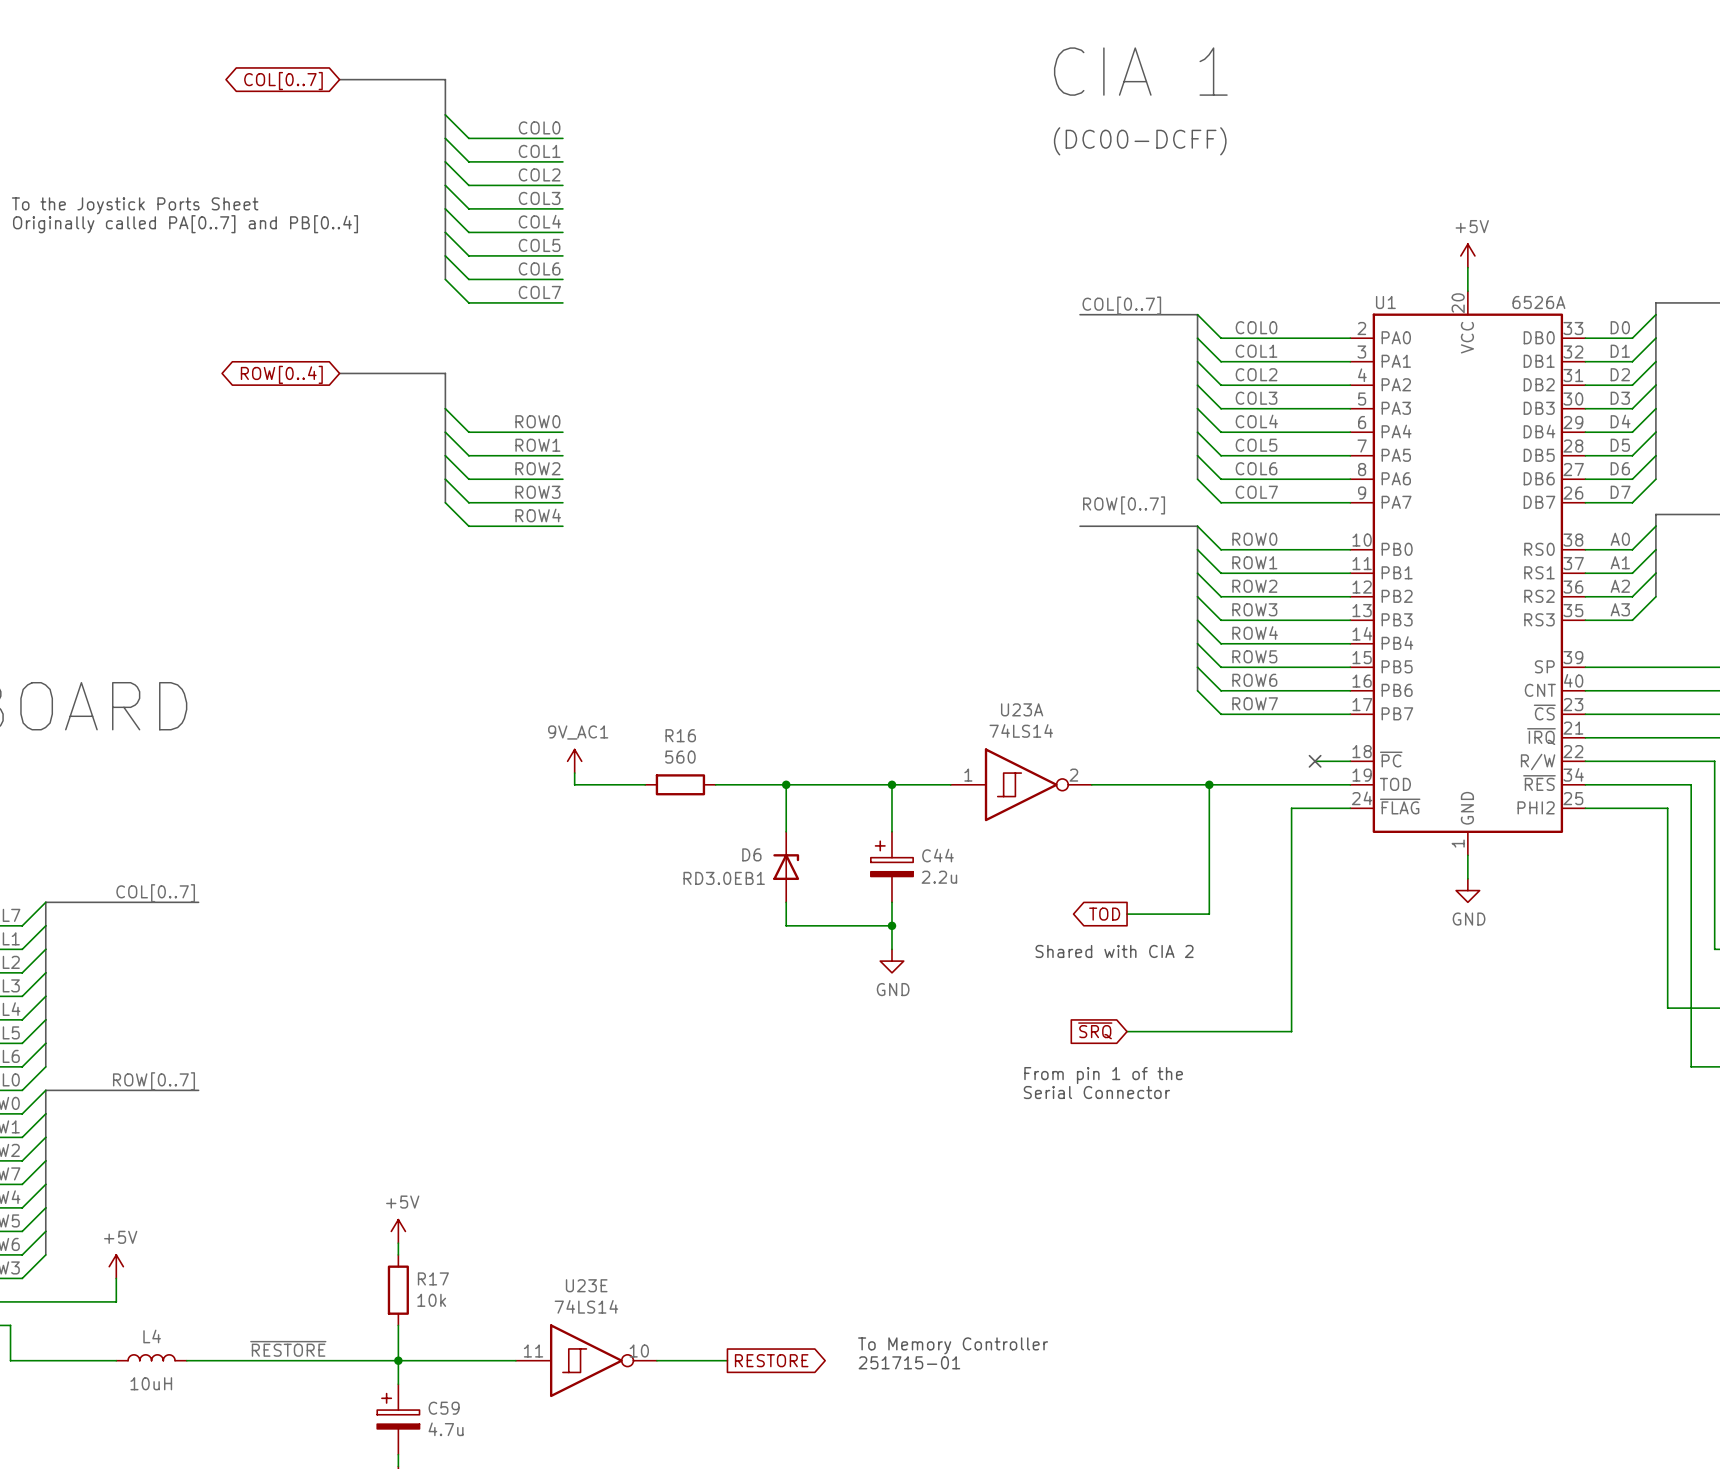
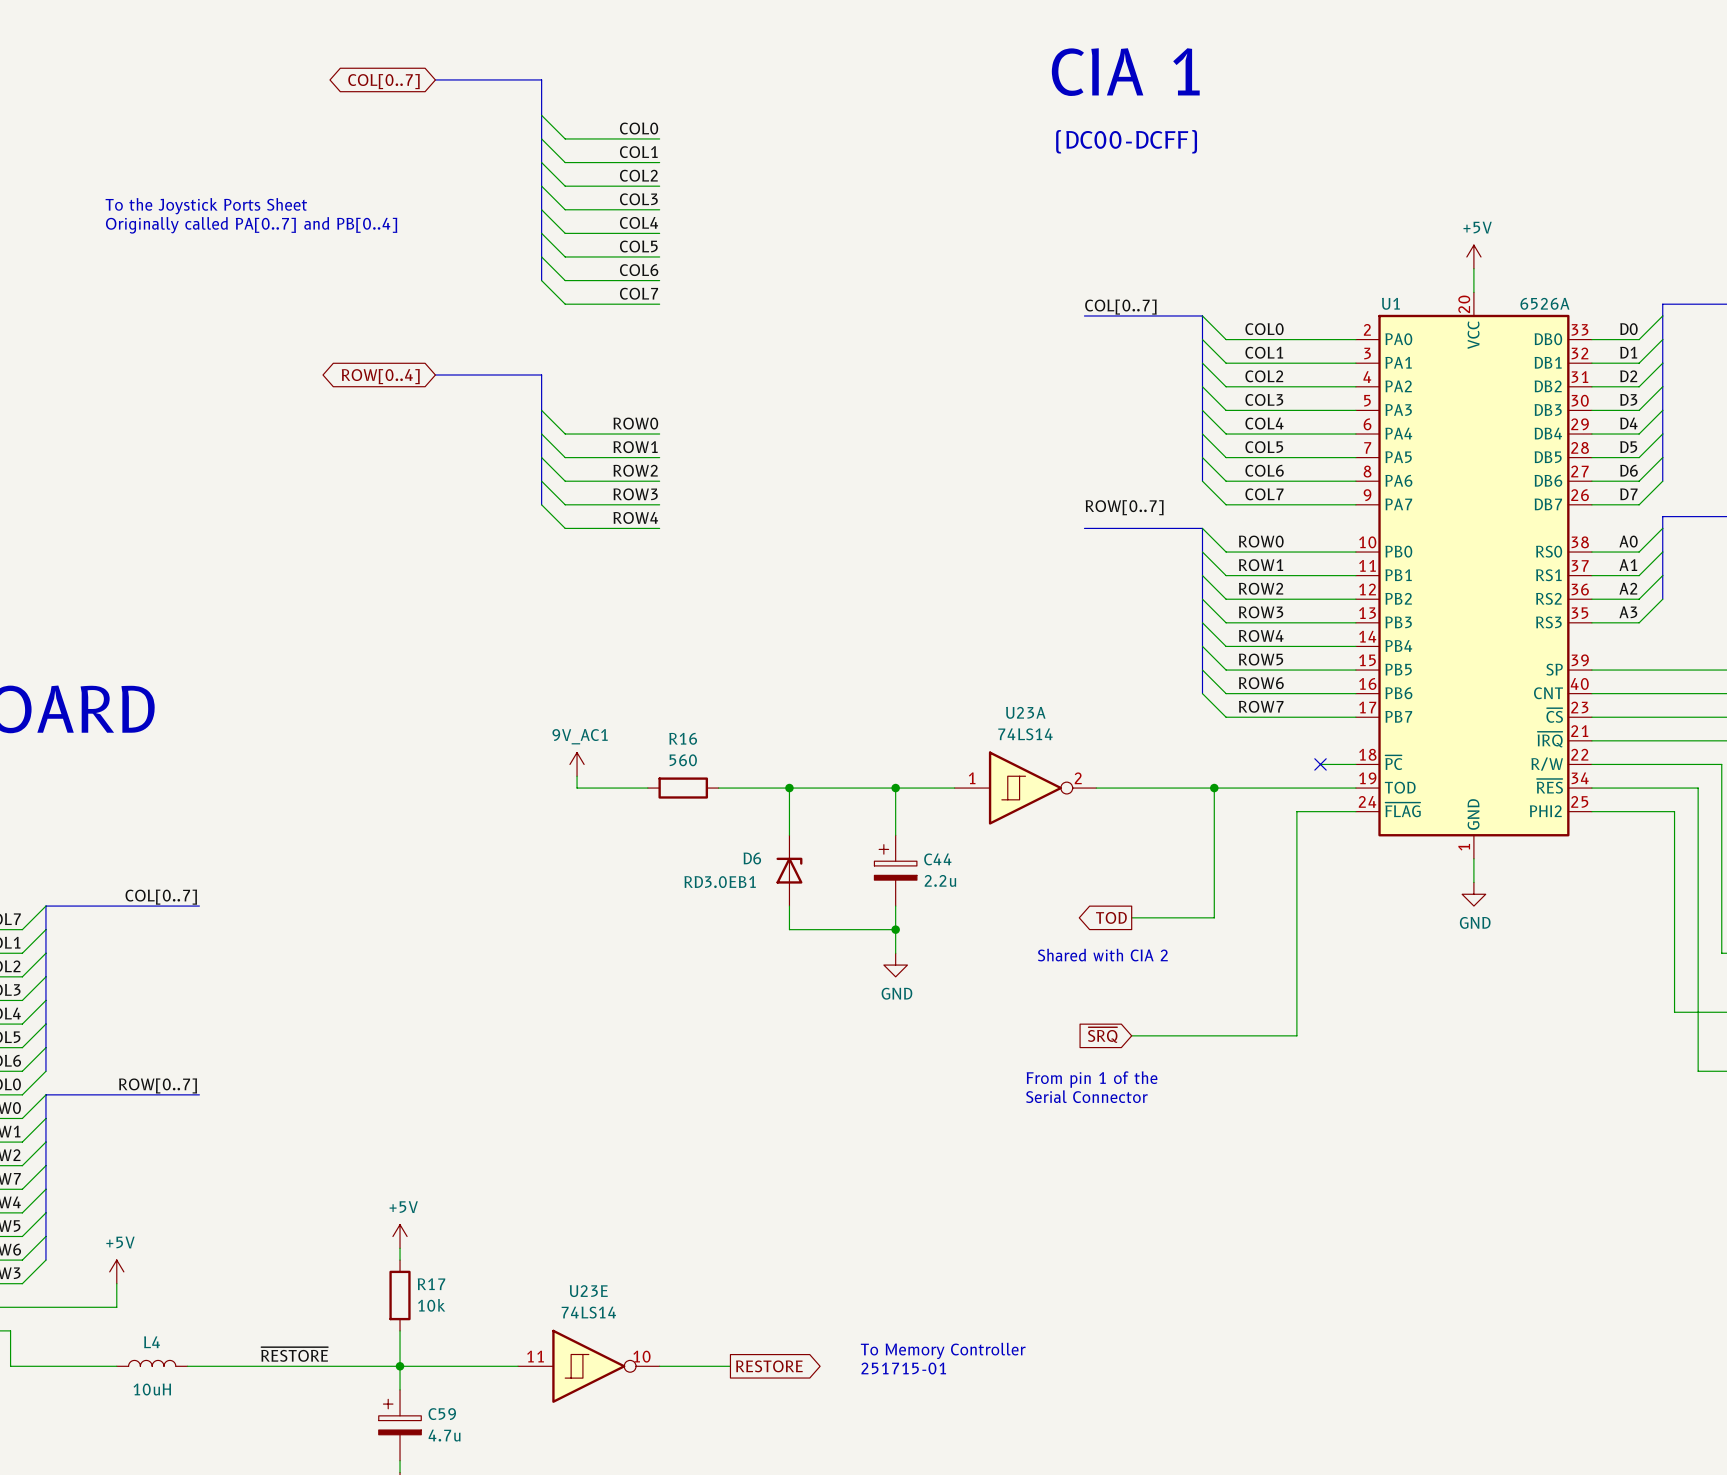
bus: (339, 79) (433, 79) -> none
bus: (445, 79) (445, 279) -> (447, 79) (541, 79) (541, 280)
global label position: COL[0..7] (283, 81) -> COL[0..7] (384, 81)
wire: (445, 114) (468, 138) (562, 138) -> (541, 115) (565, 138) (659, 138)
label position: COL0 (539, 127) -> COL0 (639, 128)
wire: (445, 138) (468, 161) (562, 161) -> (541, 138) (565, 162) (659, 162)
label position: COL1 (539, 151) -> COL1 (638, 152)
wire: (445, 161) (468, 185) (562, 185) -> (541, 162) (565, 186) (659, 186)
label position: COL2 (539, 174) -> COL2 (638, 175)
wire: (445, 185) (468, 208) (562, 208) -> (541, 186) (565, 209) (659, 209)
label position: COL3 (539, 198) -> COL3 (638, 199)
text position: To the Joystick Ports Sheet (135, 205) -> To the Joystick Ports Sheet (206, 206)
wire: (445, 208) (468, 232) (562, 232) -> (541, 209) (565, 233) (659, 233)
label position: COL4 (539, 221) -> COL4 (639, 222)
text position: Originally called PA[0..7] and PB[0..4] (185, 224) -> Originally called PA[0..7] and PB[0..4] (251, 225)
wire: (445, 232) (468, 255) (562, 255) -> (541, 233) (565, 256) (659, 256)
label position: COL5 (539, 245) -> COL5 (638, 246)
wire: (445, 255) (468, 279) (562, 279) -> (541, 256) (565, 280) (659, 280)
label position: COL6 (539, 268) -> COL6 (639, 270)
wire: (445, 279) (468, 302) (562, 302) -> (541, 280) (565, 304) (659, 304)
label position: COL7 (539, 292) -> COL7 (639, 293)
bus: (339, 373) (433, 373) -> none
bus: (445, 373) (445, 502) -> (447, 375) (541, 375) (541, 504)
global label position: ROW[0..4] (281, 374) -> ROW[0..4] (380, 376)
wire: (445, 408) (468, 432) (562, 432) -> (541, 410) (565, 434) (659, 434)
label position: ROW0 (537, 421) -> ROW0 (635, 423)
wire: (445, 432) (468, 455) (562, 455) -> (541, 434) (565, 457) (659, 457)
label position: ROW1 (537, 445) -> ROW1 (635, 447)
wire: (445, 455) (468, 479) (562, 479) -> (541, 457) (565, 481) (659, 481)
label position: ROW2 (537, 468) -> ROW2 (635, 470)
wire: (445, 479) (468, 502) (562, 502) -> (541, 481) (565, 504) (659, 504)
label position: ROW3 (537, 492) -> ROW3 (635, 494)
wire: (445, 502) (468, 526) (562, 526) -> (541, 504) (565, 528) (659, 528)
label position: ROW4 (538, 515) -> ROW4 (635, 517)

